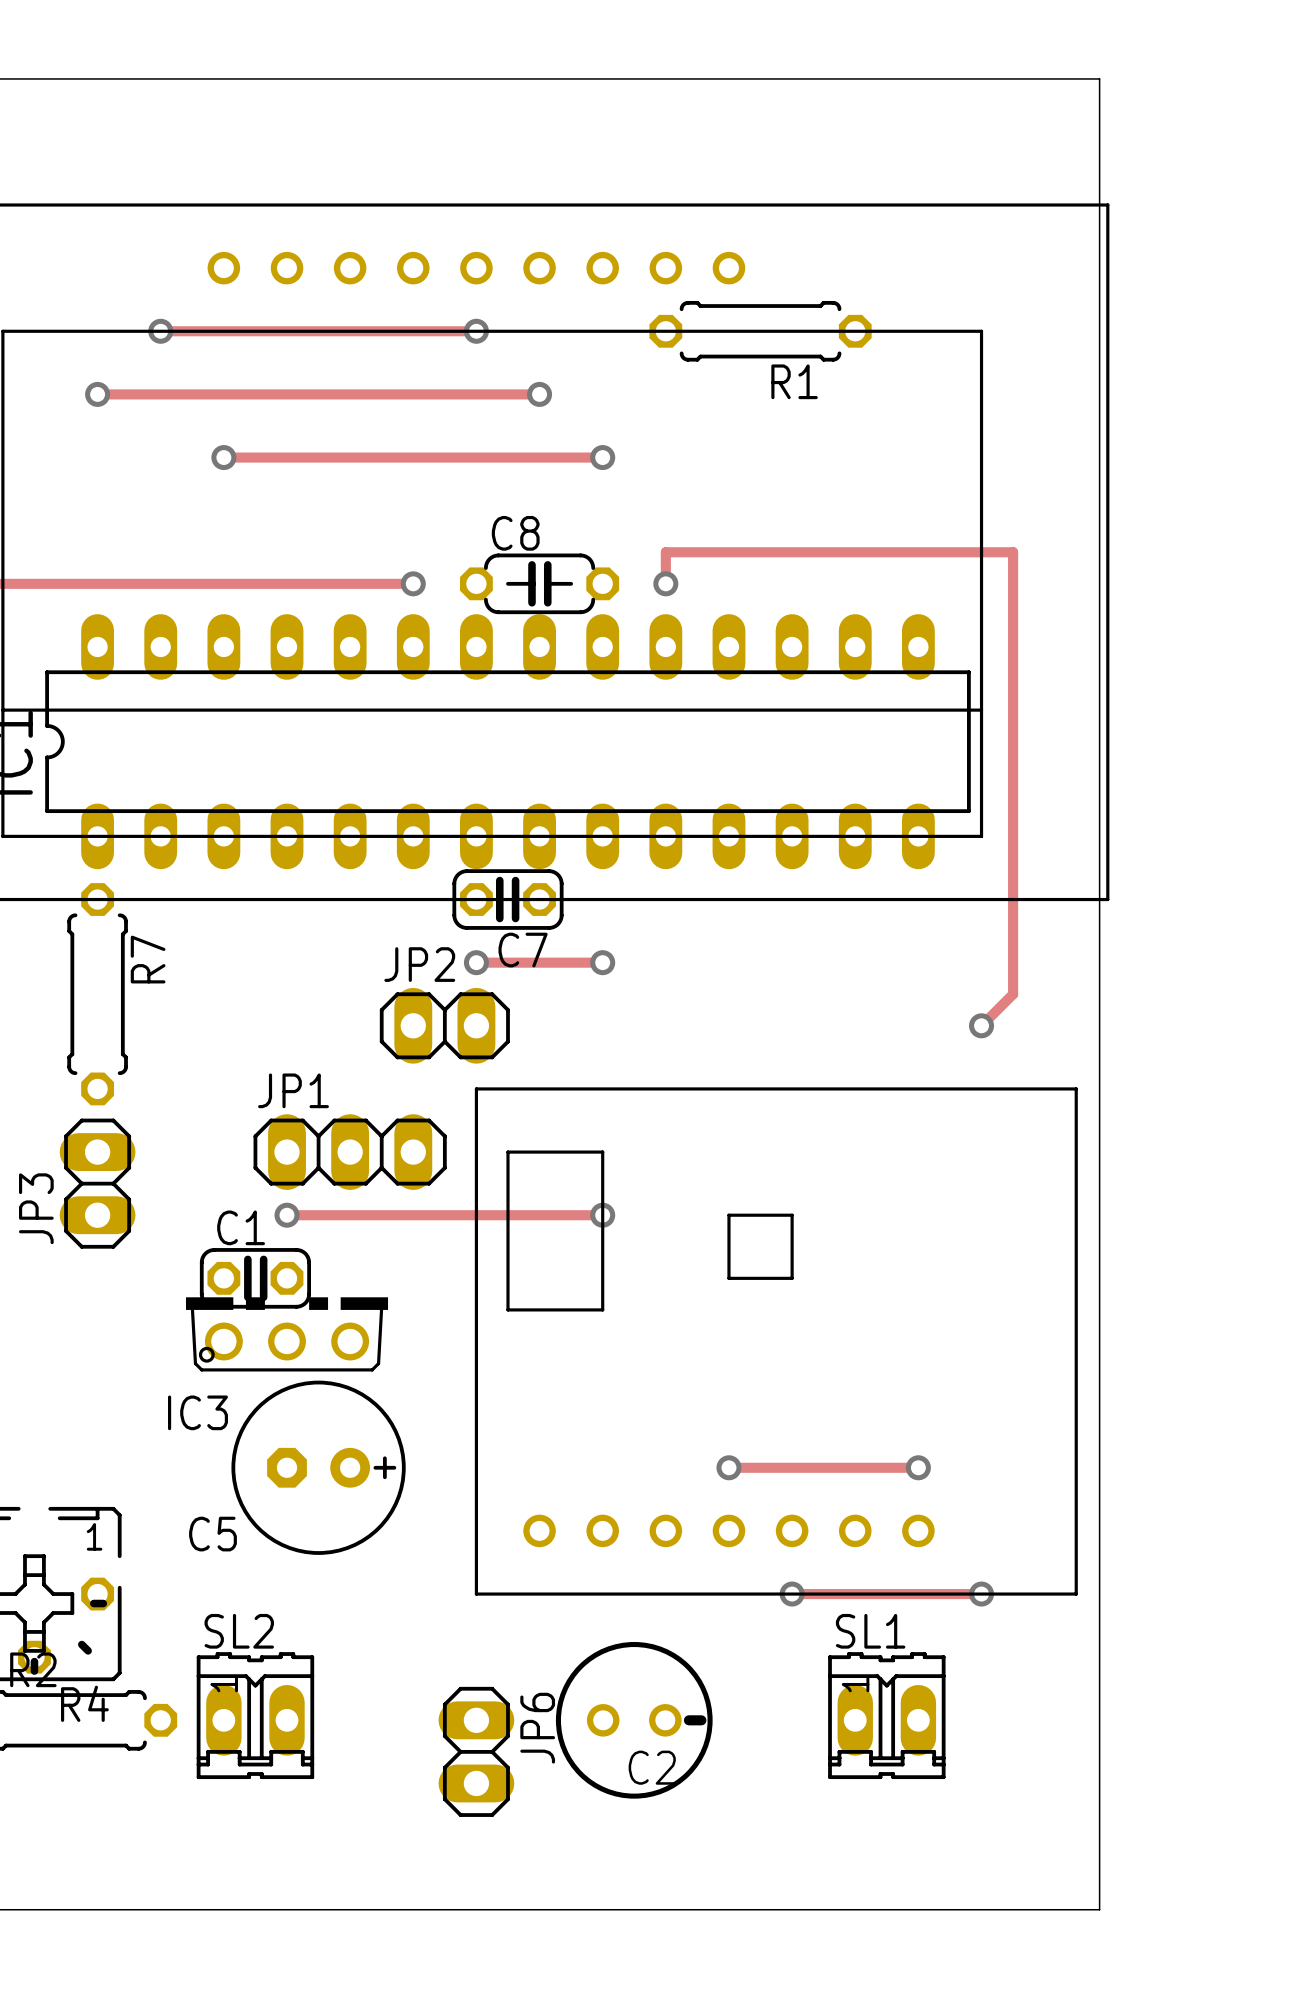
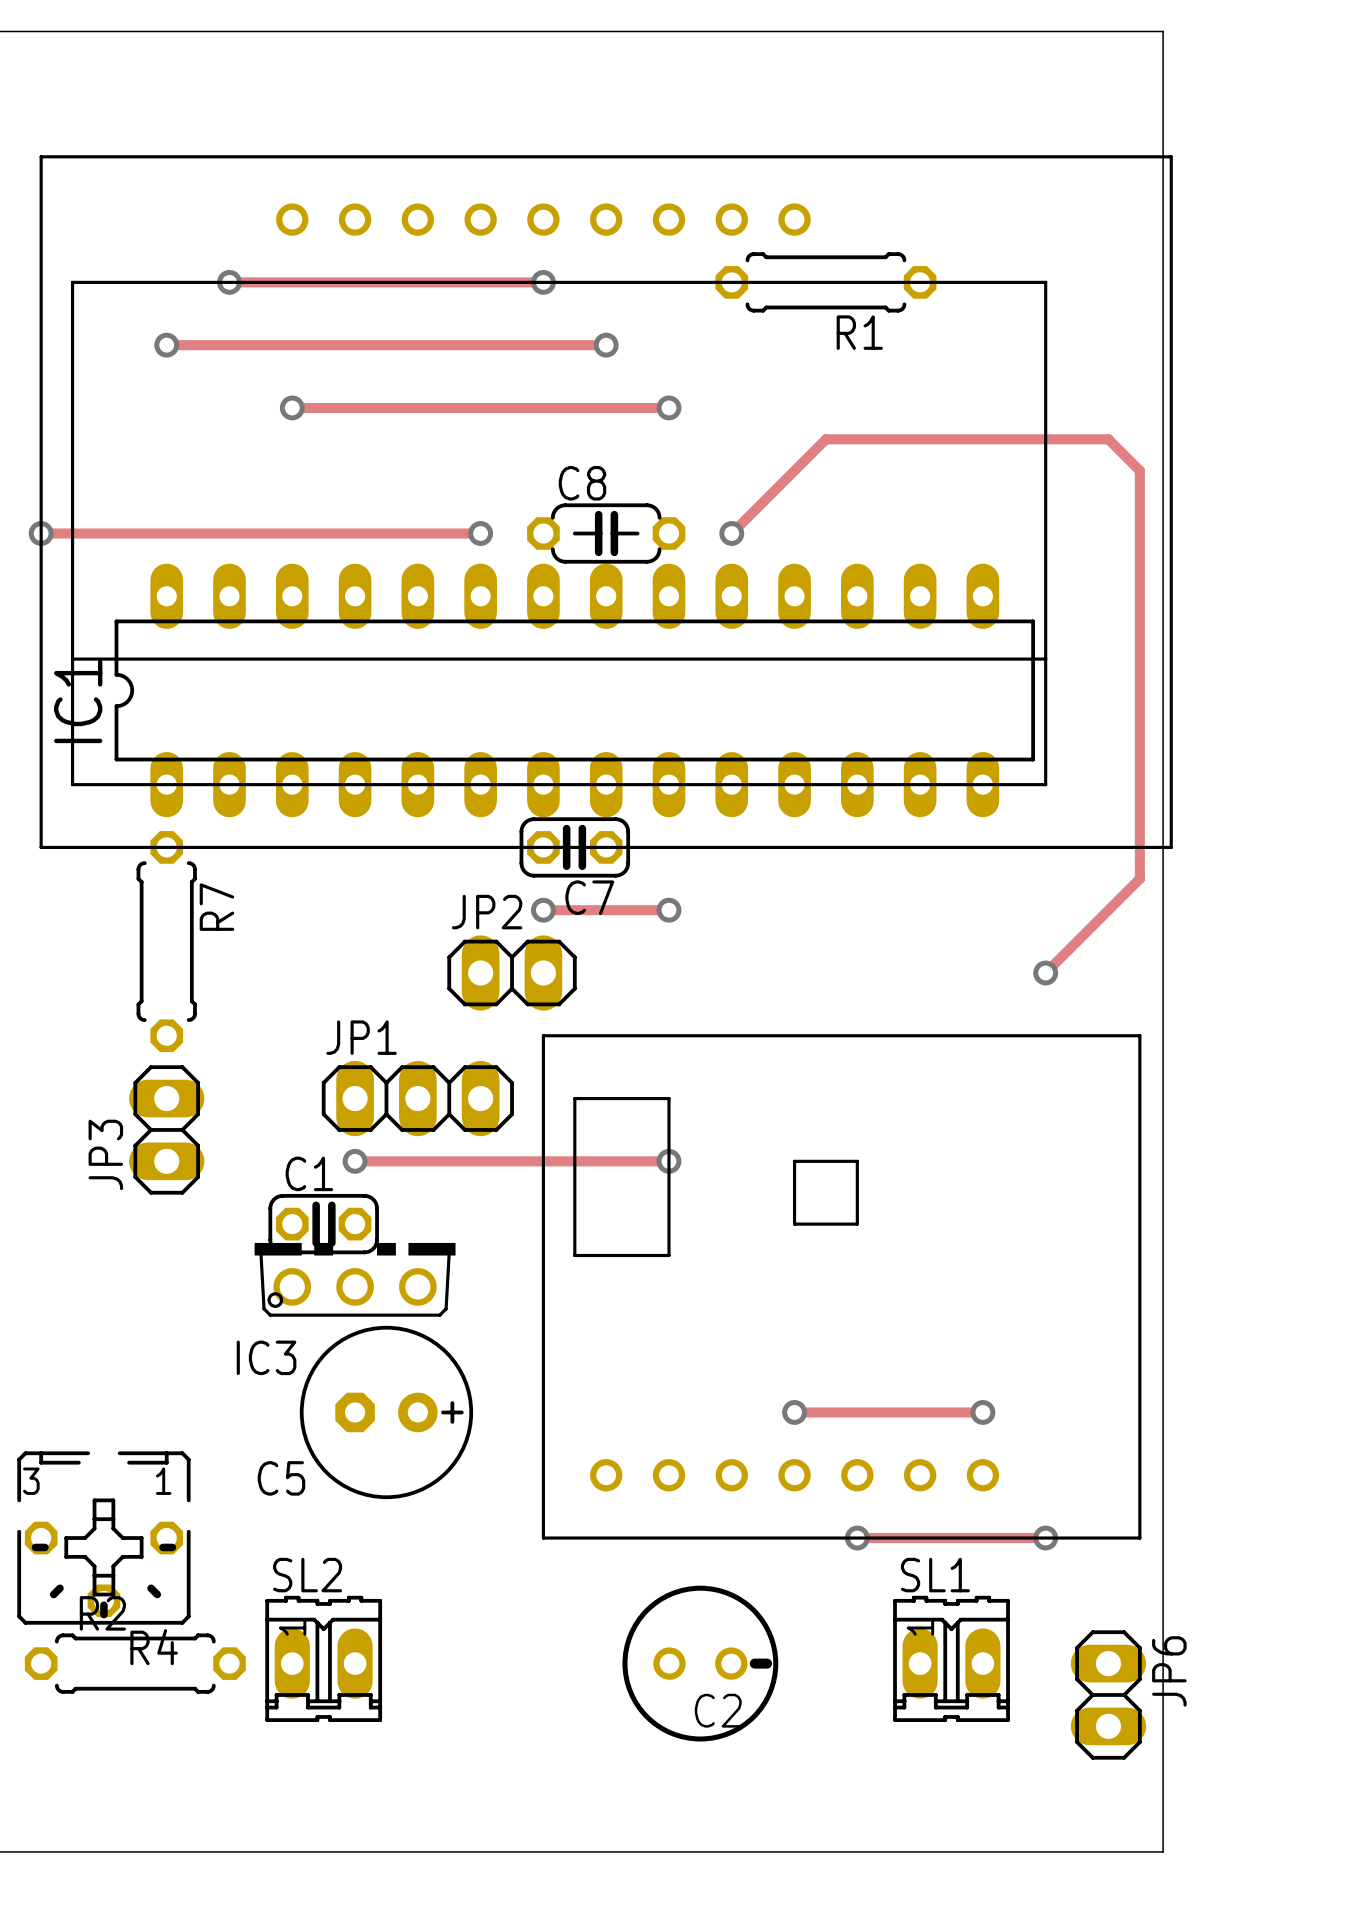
track: (665, 583) (665, 552) (1013, 552) (1013, 994) -> (731, 533) (825, 439) (1108, 439) (1139, 470) (1139, 878) (1077, 941)
JP6 position: (476, 1751) -> (1108, 1694)

